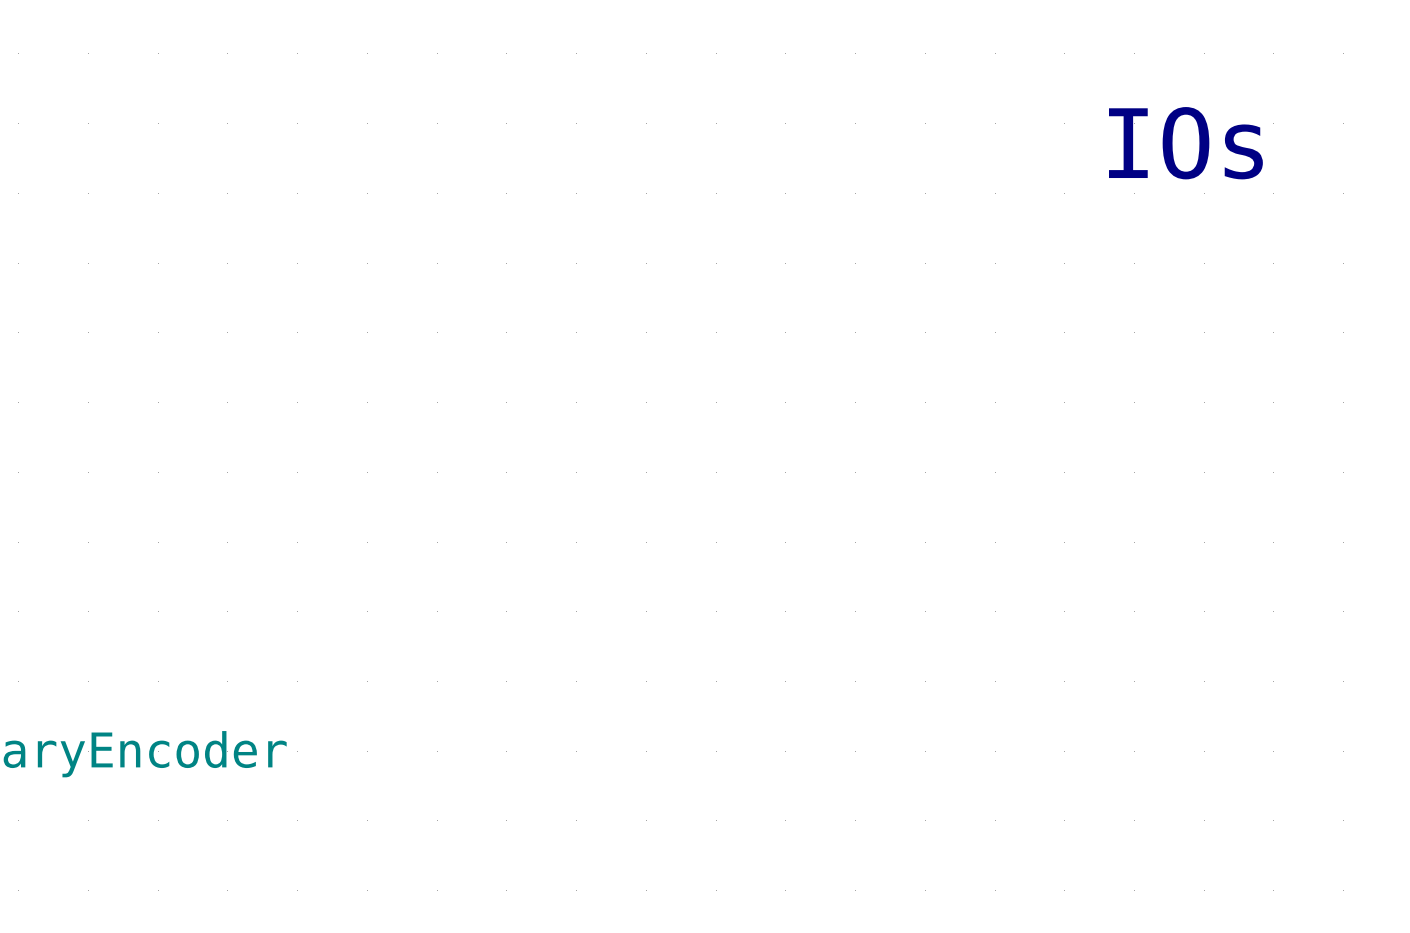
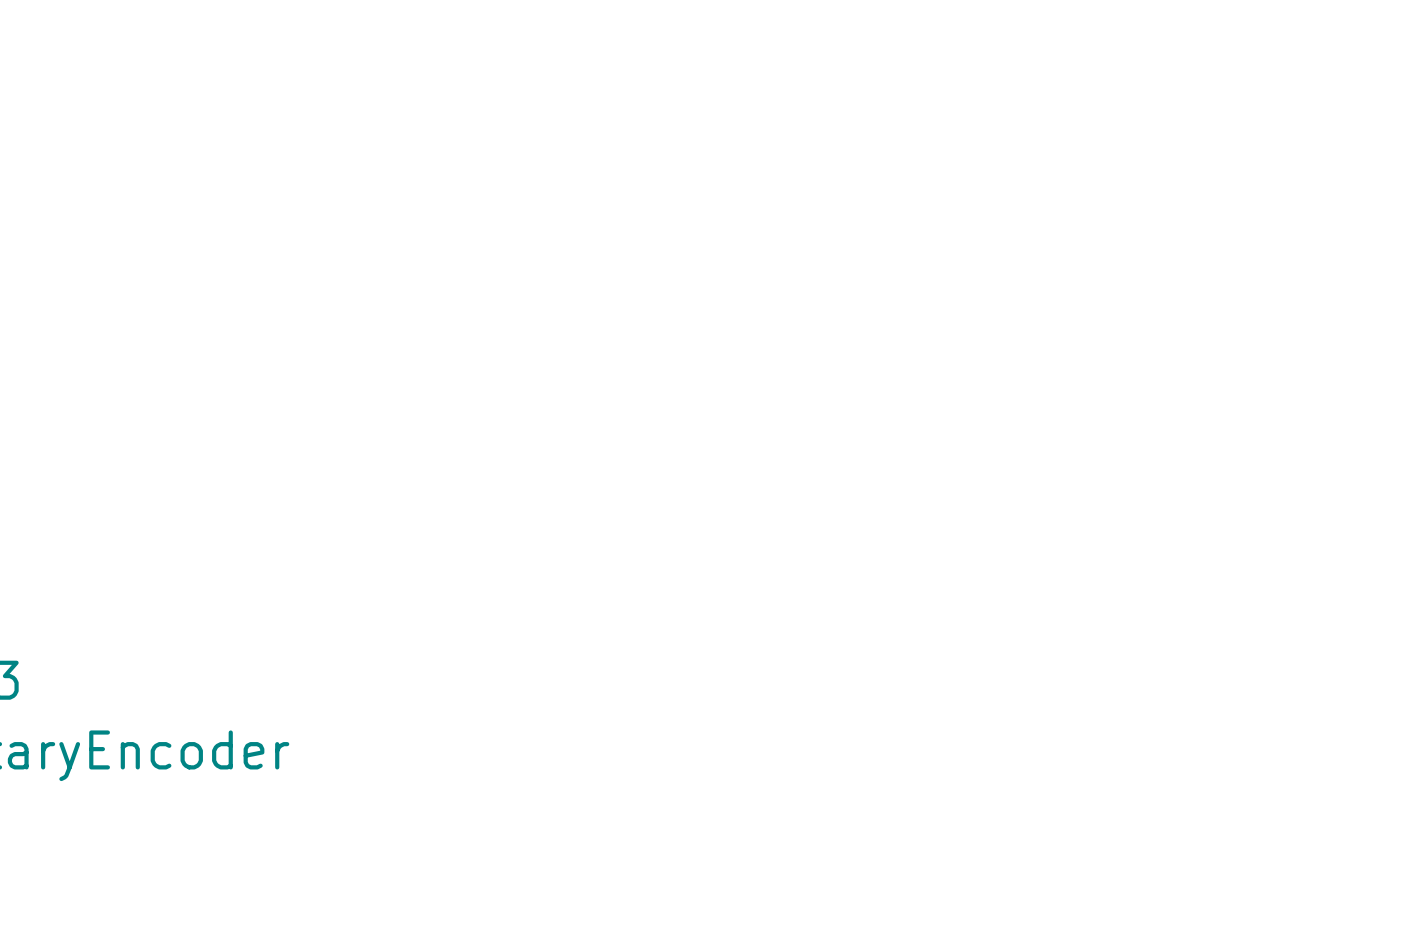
text: IOs (1185, 143) -> none

